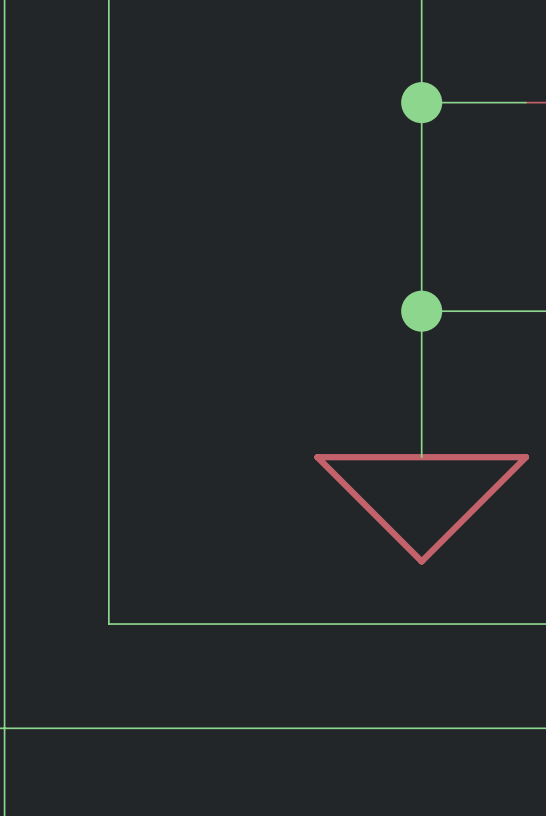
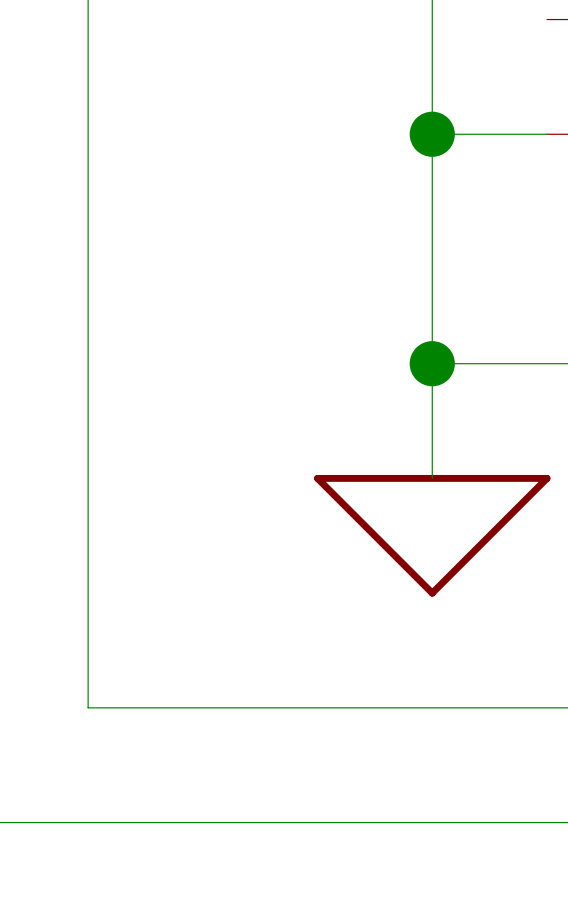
wire: (421, 415) (421, 457) -> none
power symbol position: (421, 509) -> (432, 535)

